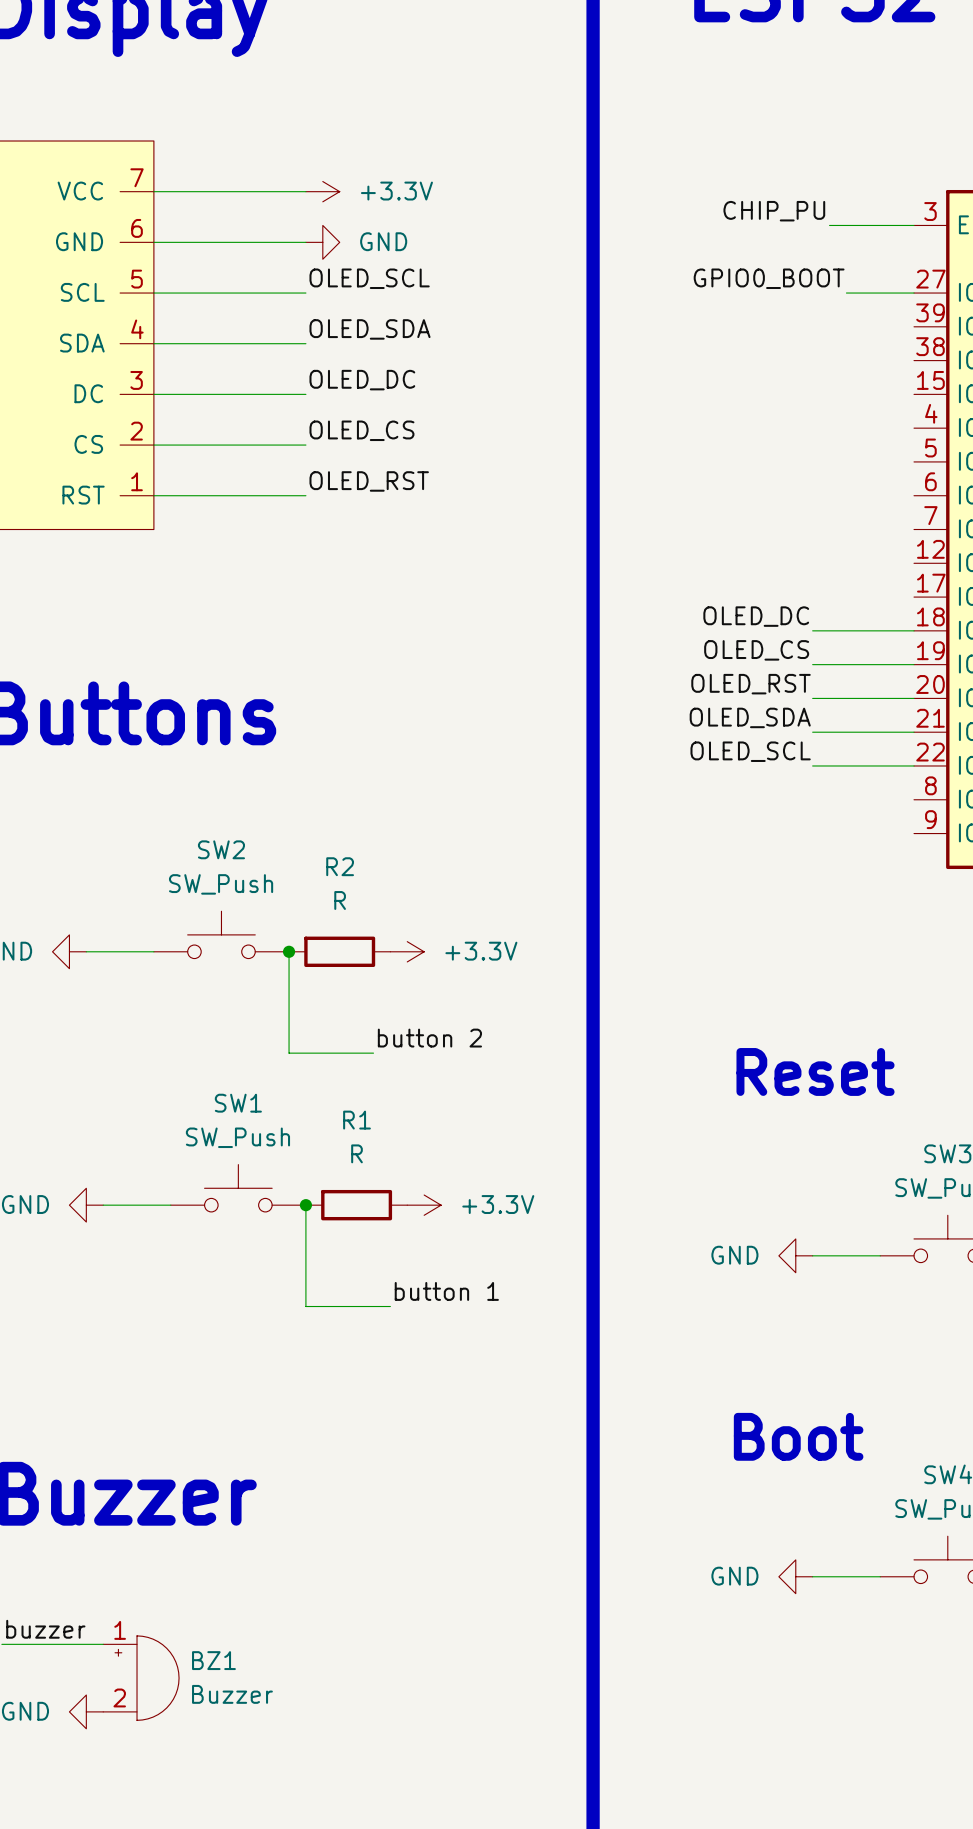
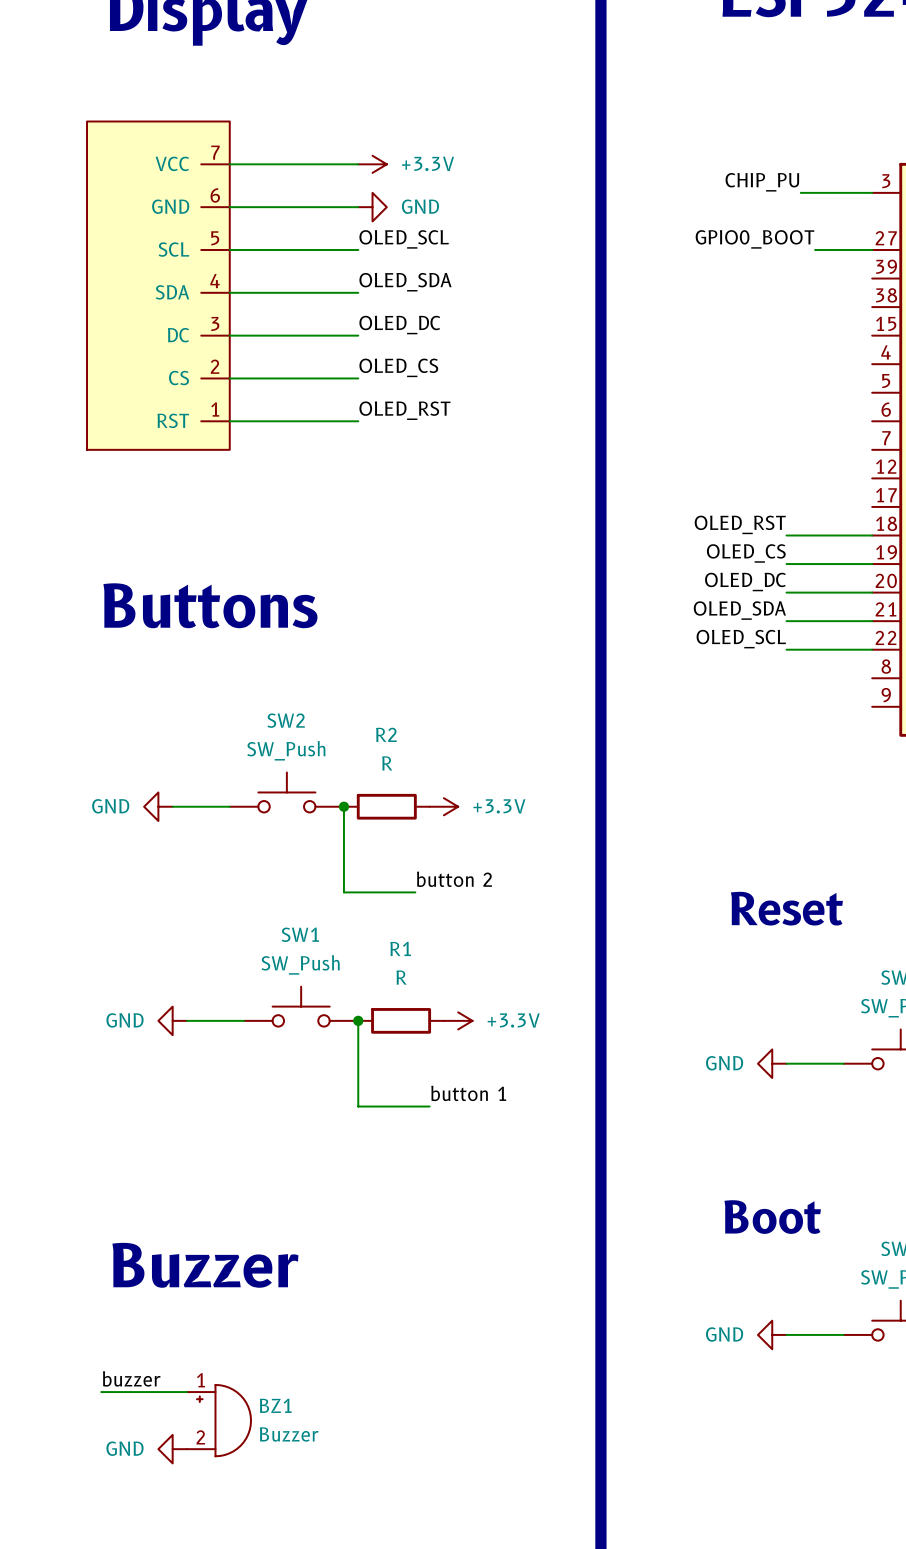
label: OLED_DC (756, 616) -> OLED_RST (740, 524)
label: OLED_RST (751, 684) -> OLED_DC (745, 582)

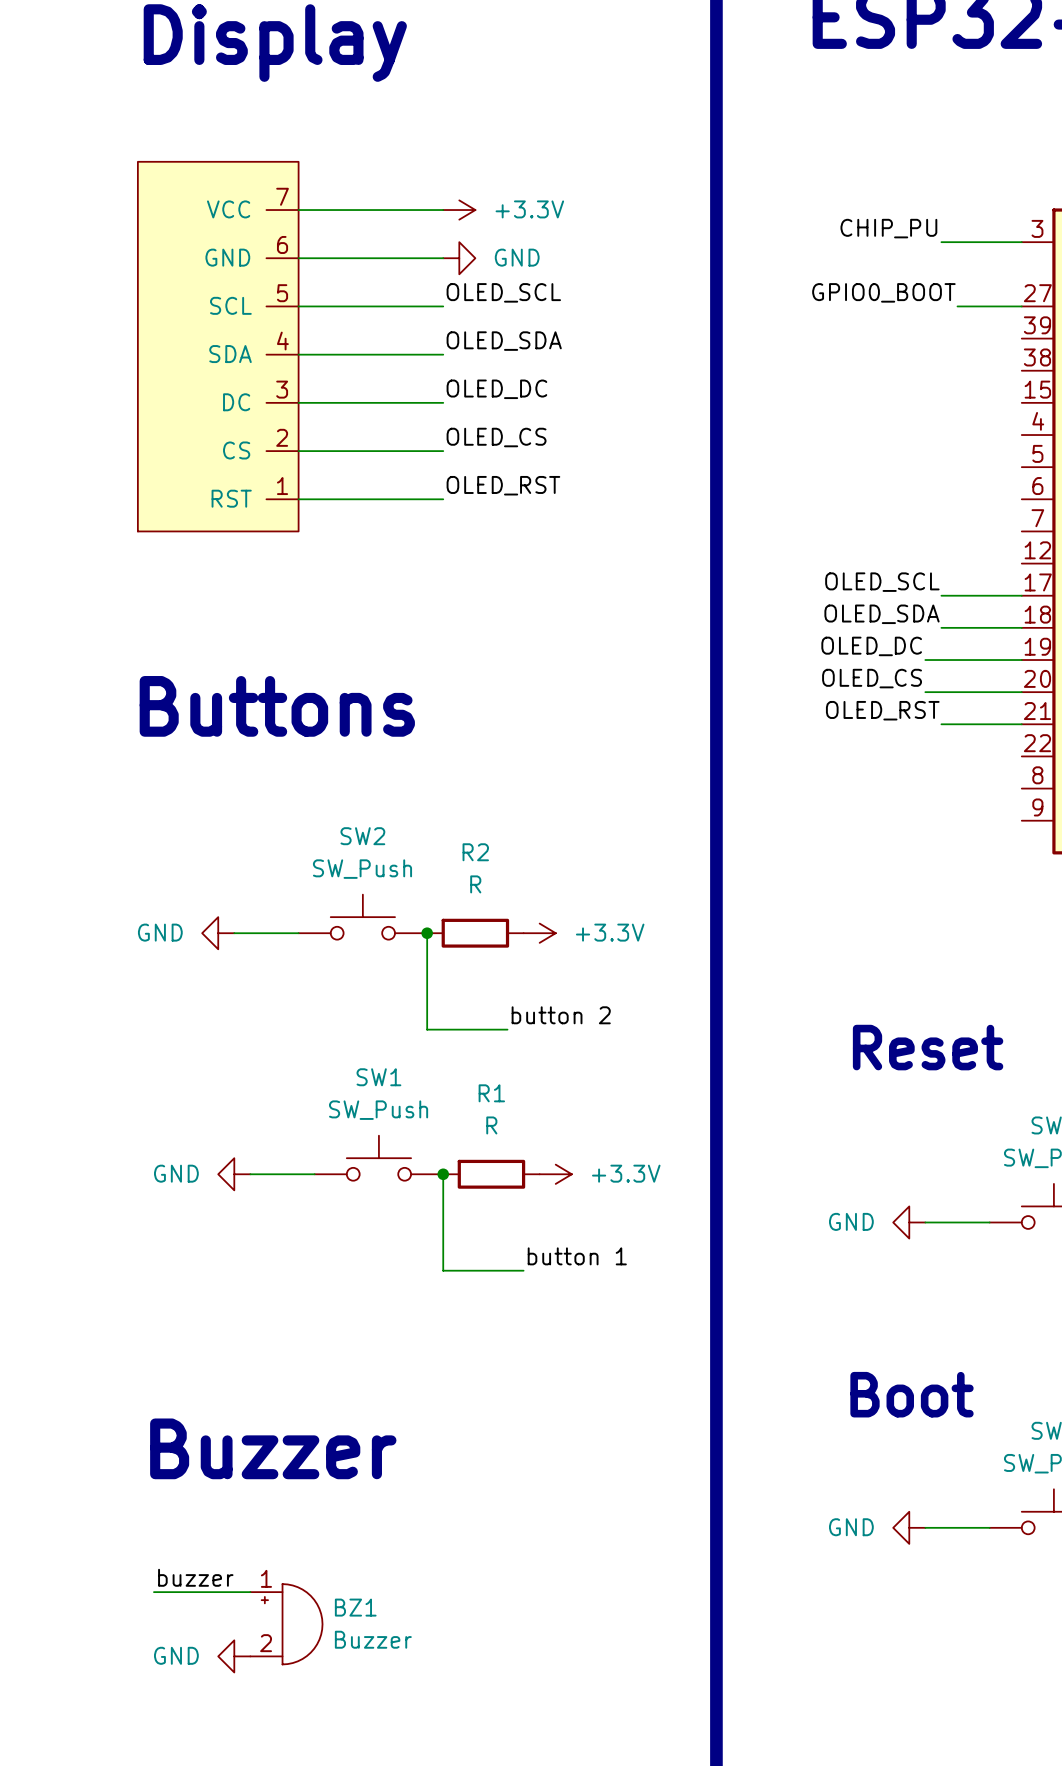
wire: none -> (941, 595) (1021, 595)
label position: OLED_RST (740, 524) -> OLED_RST (882, 710)
wire: (786, 535) (800, 535) -> none
label: OLED_CS (746, 553) -> OLED_DC (871, 646)
label: OLED_DC (745, 582) -> OLED_CS (872, 678)
label position: OLED_SDA (739, 610) -> OLED_SDA (882, 614)
wire: (786, 621) (800, 621) -> none
label position: OLED_SCL (741, 639) -> OLED_SCL (882, 582)
wire: (786, 649) (872, 649) -> none

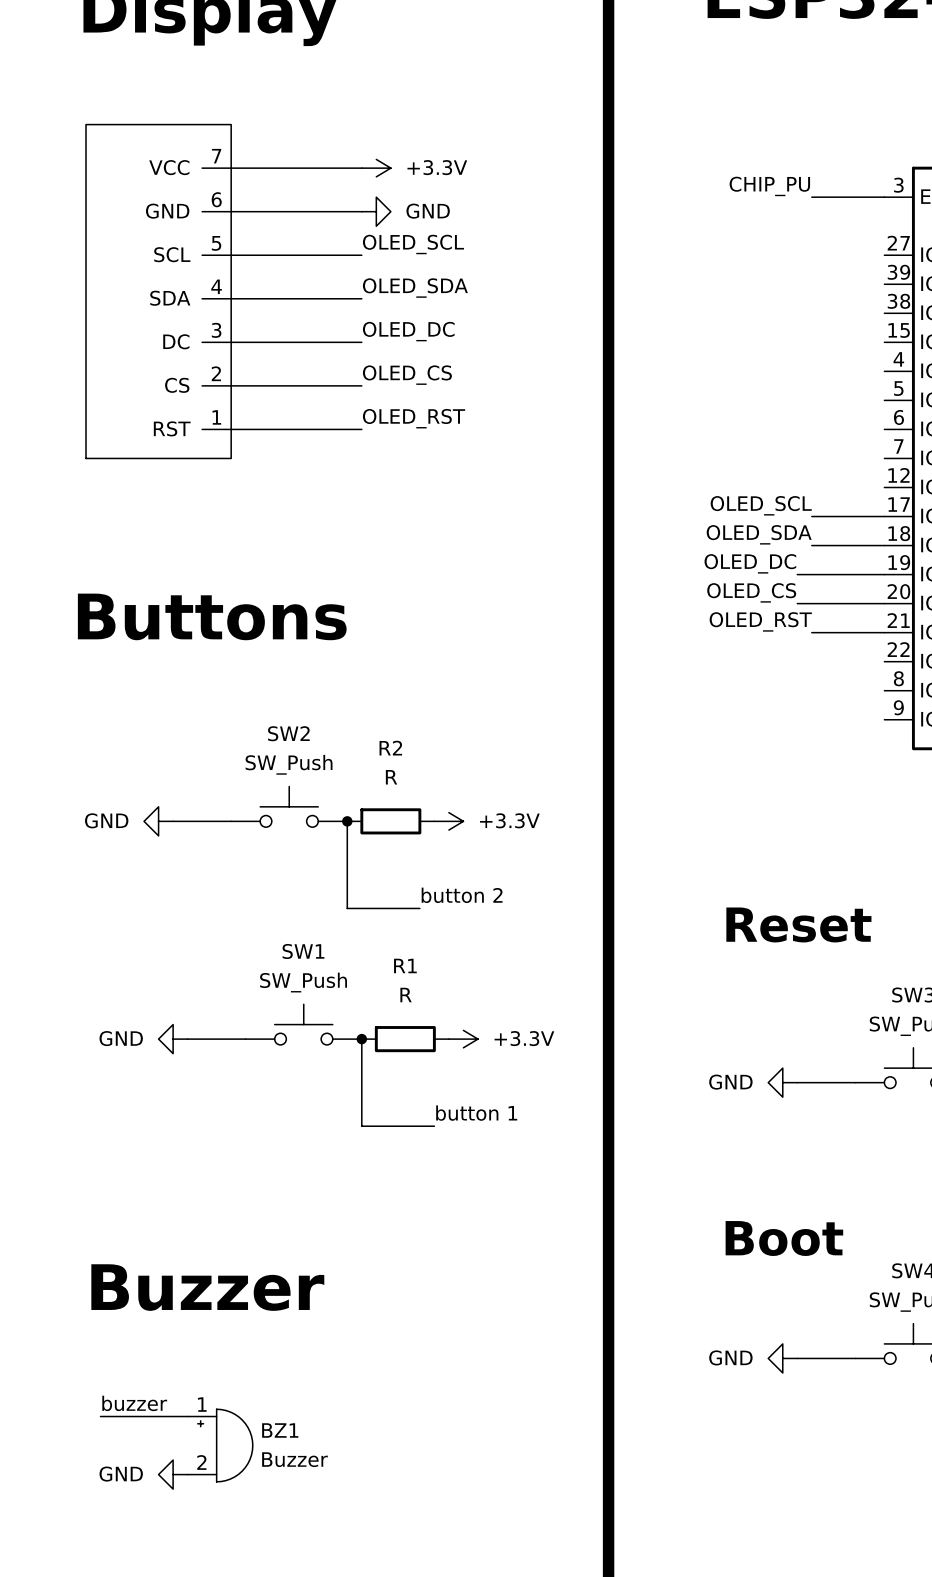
label: GPIO0_BOOT (883, 292) -> none
wire: (957, 306) (1021, 306) -> none

